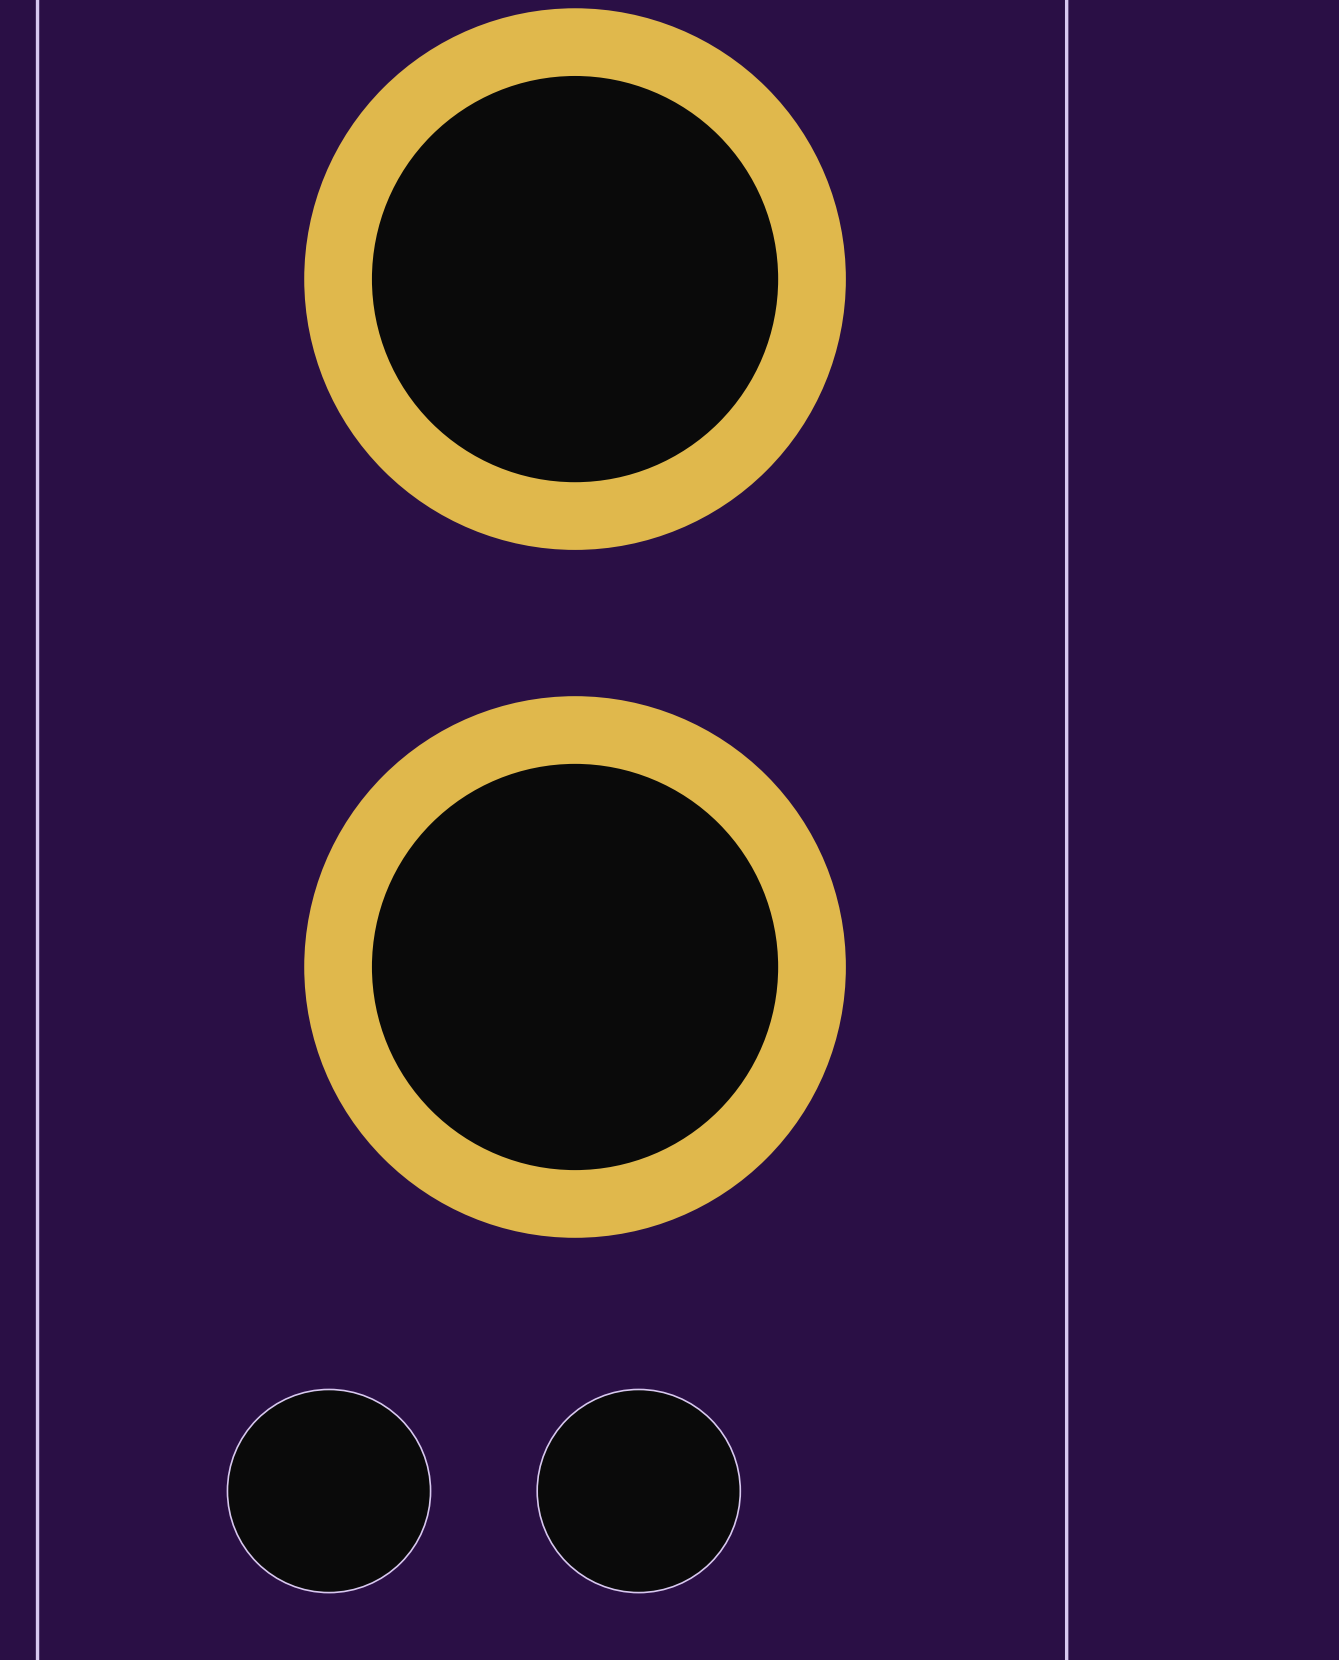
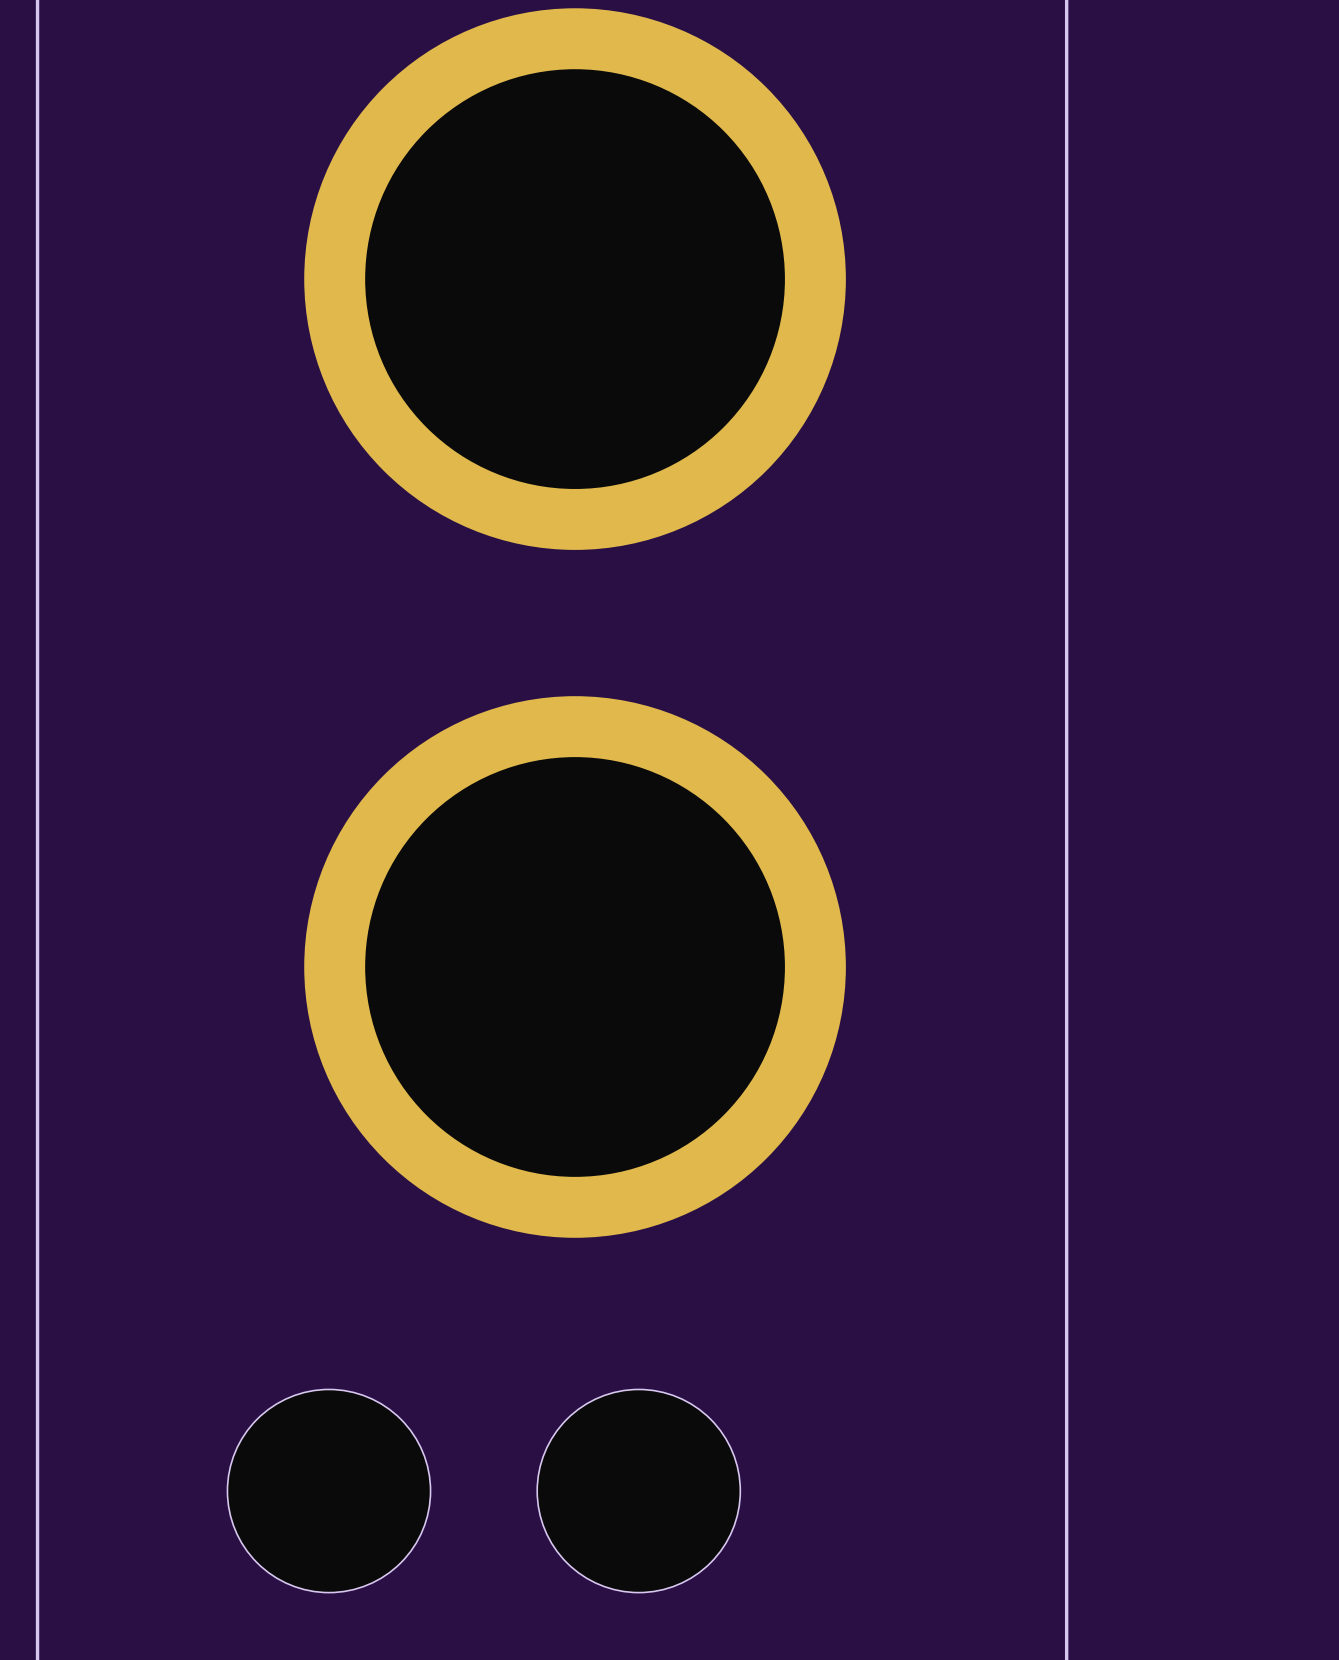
part footprint: [304, 8, 846, 550] -> [304, 8, 846, 550]
part footprint: [304, 696, 846, 1238] -> [304, 696, 846, 1238]

